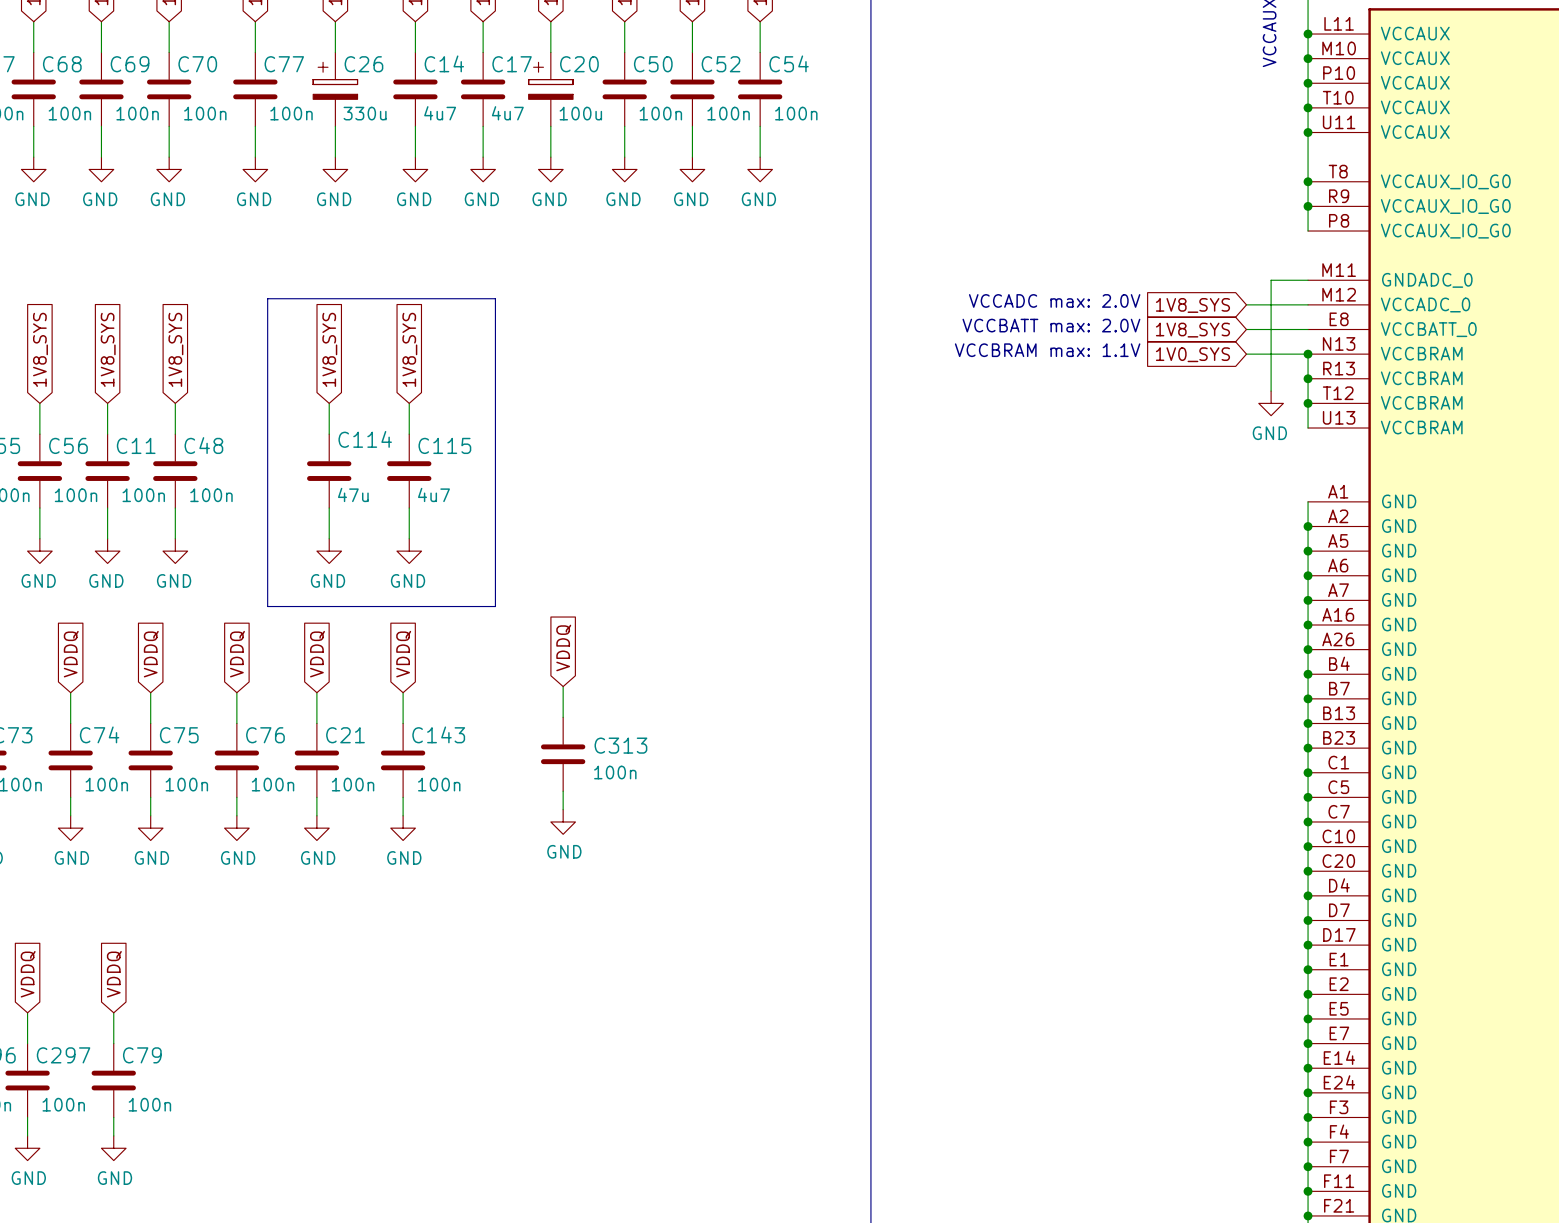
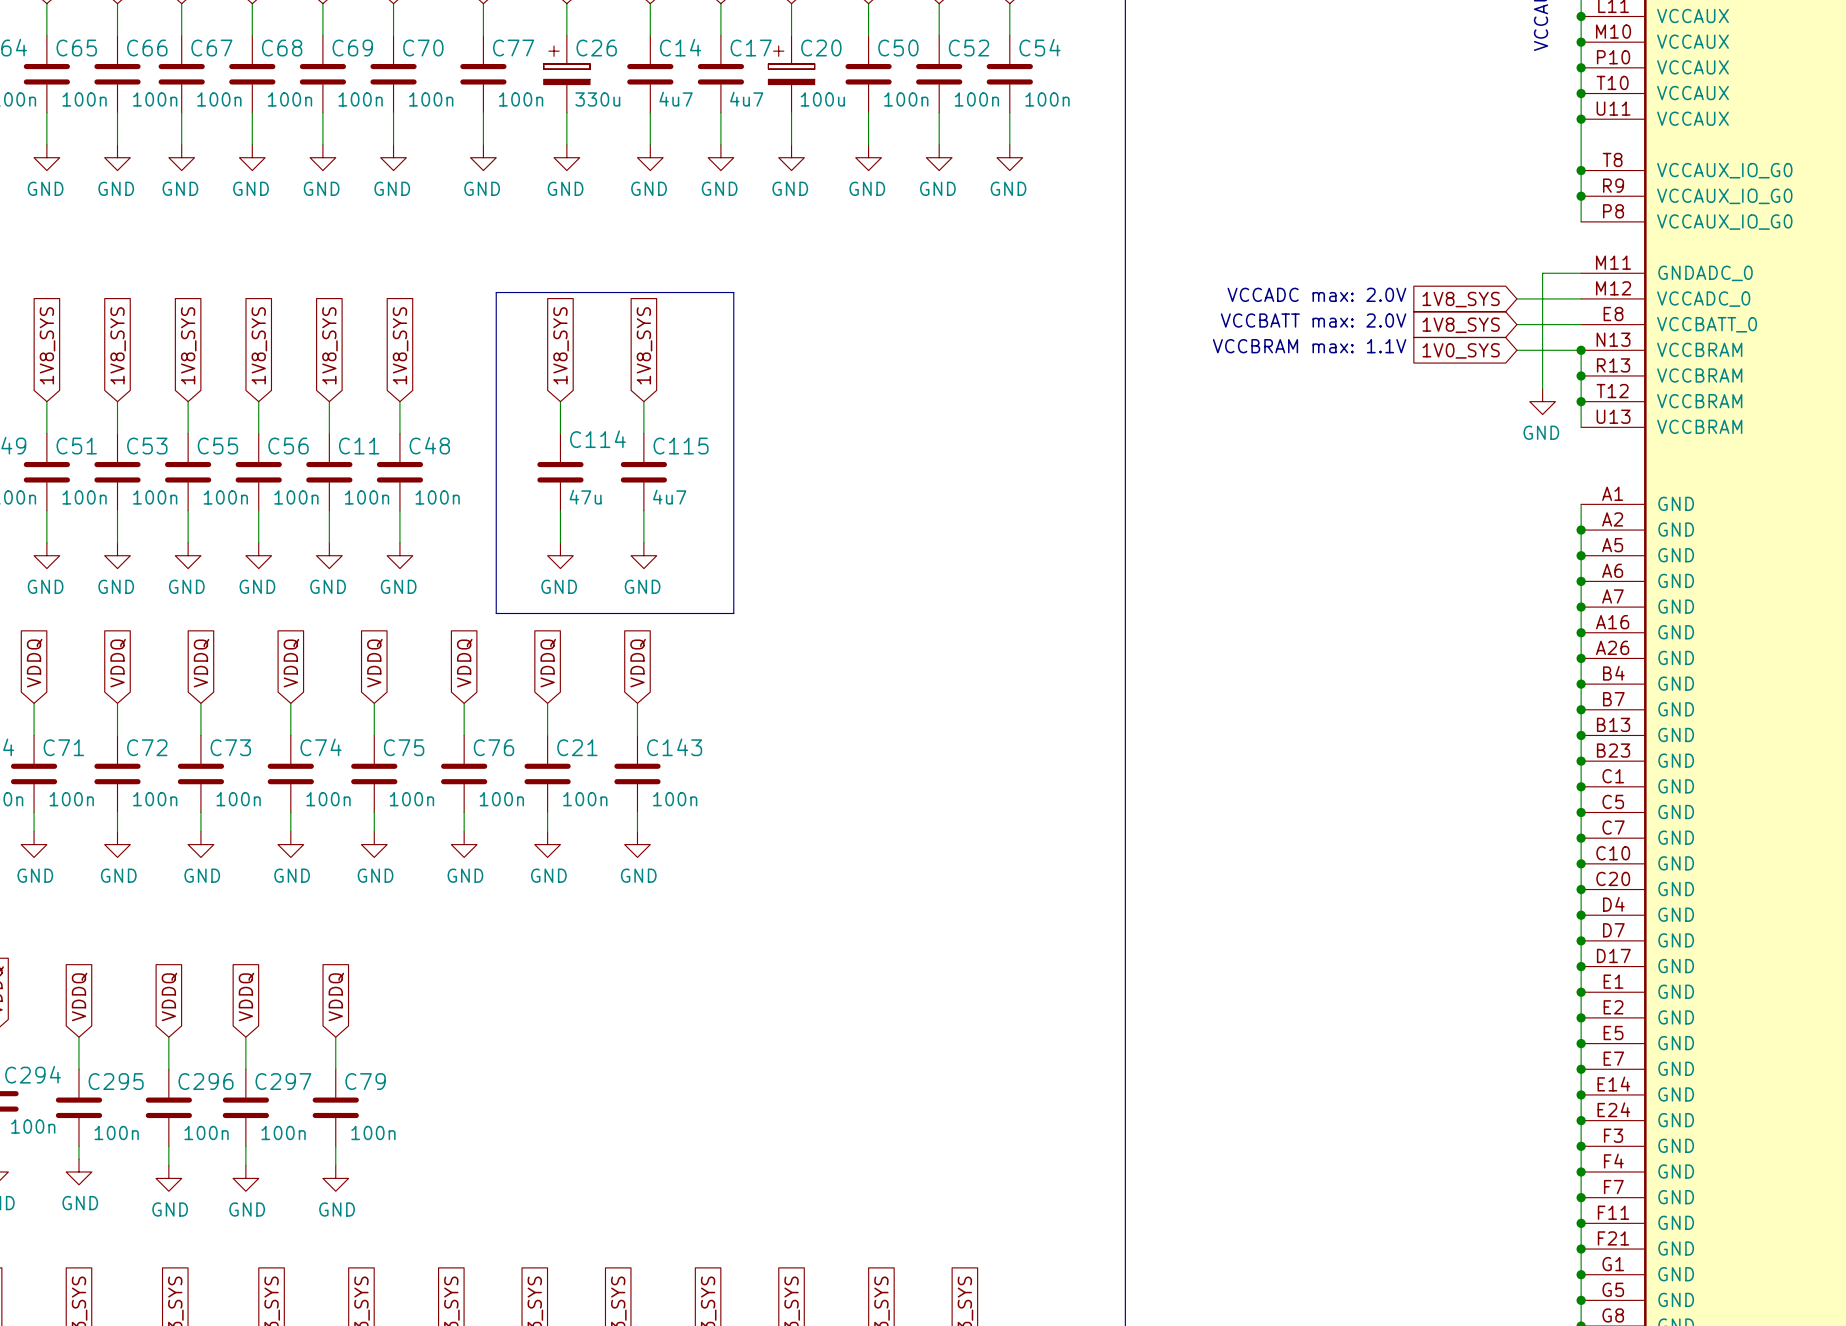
global label: VDDQ (563, 647) -> none
wire: (563, 686) (563, 717) -> none
C313: (563, 754) -> none
wire: (563, 791) (563, 809) -> none
power symbol: GND (563, 821) -> none

